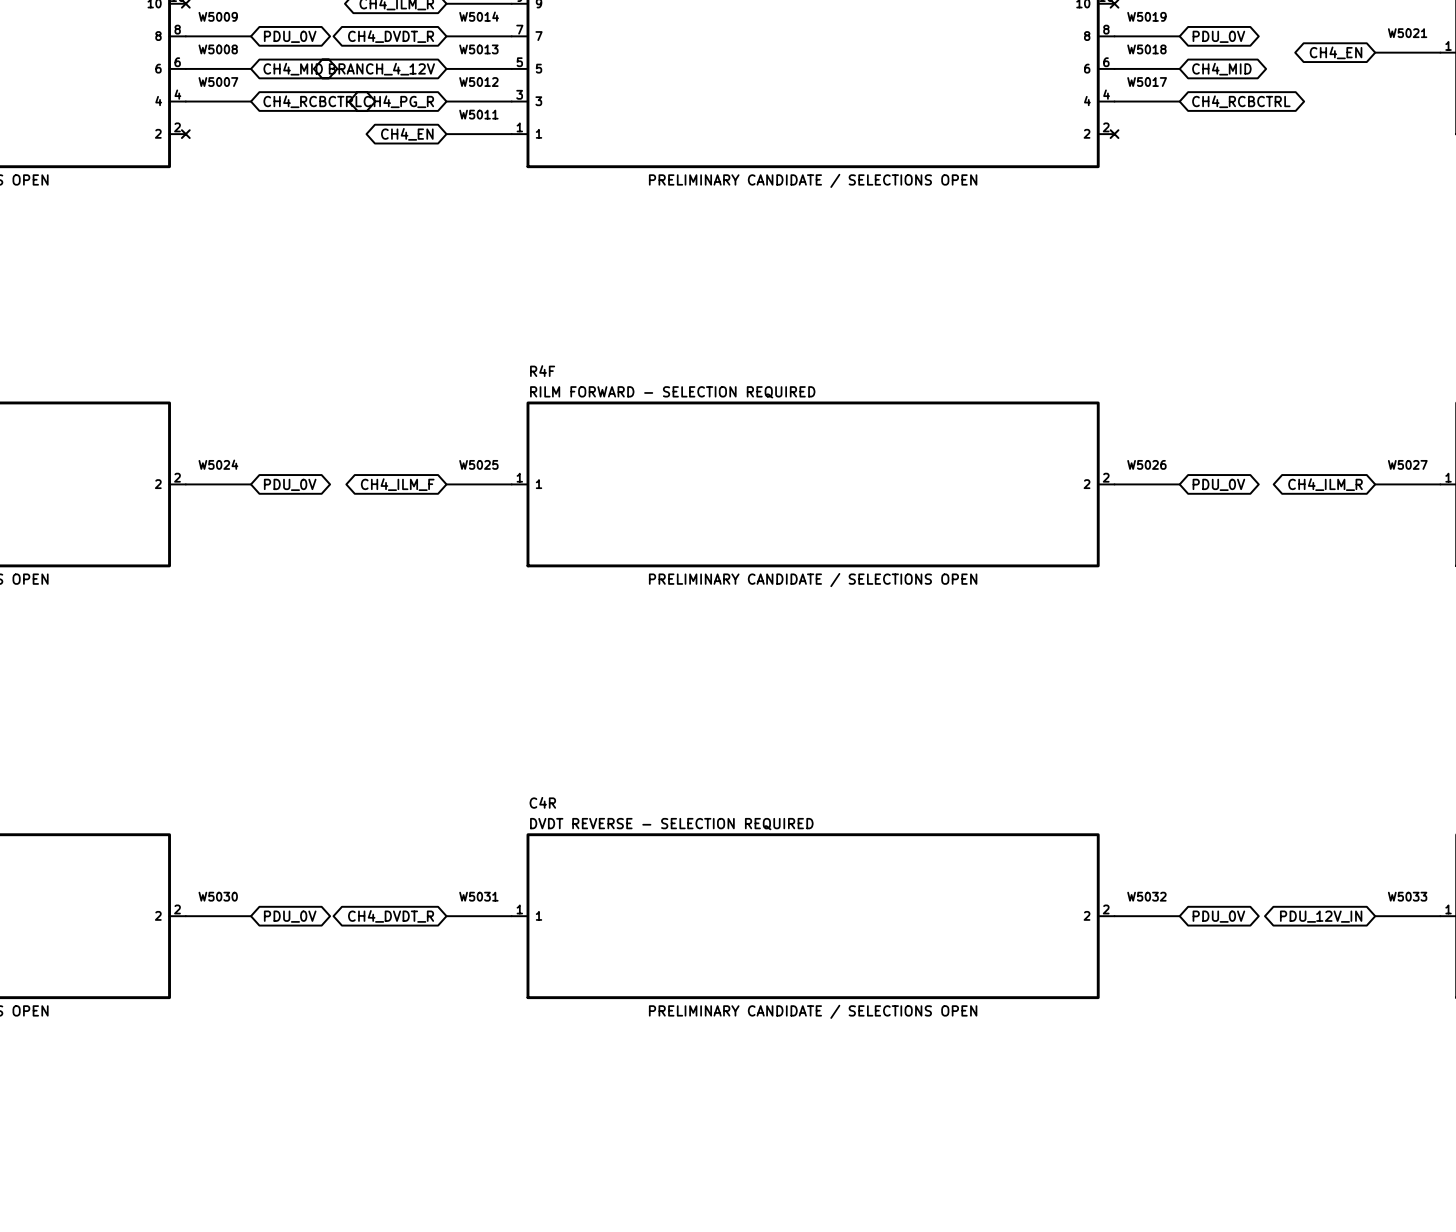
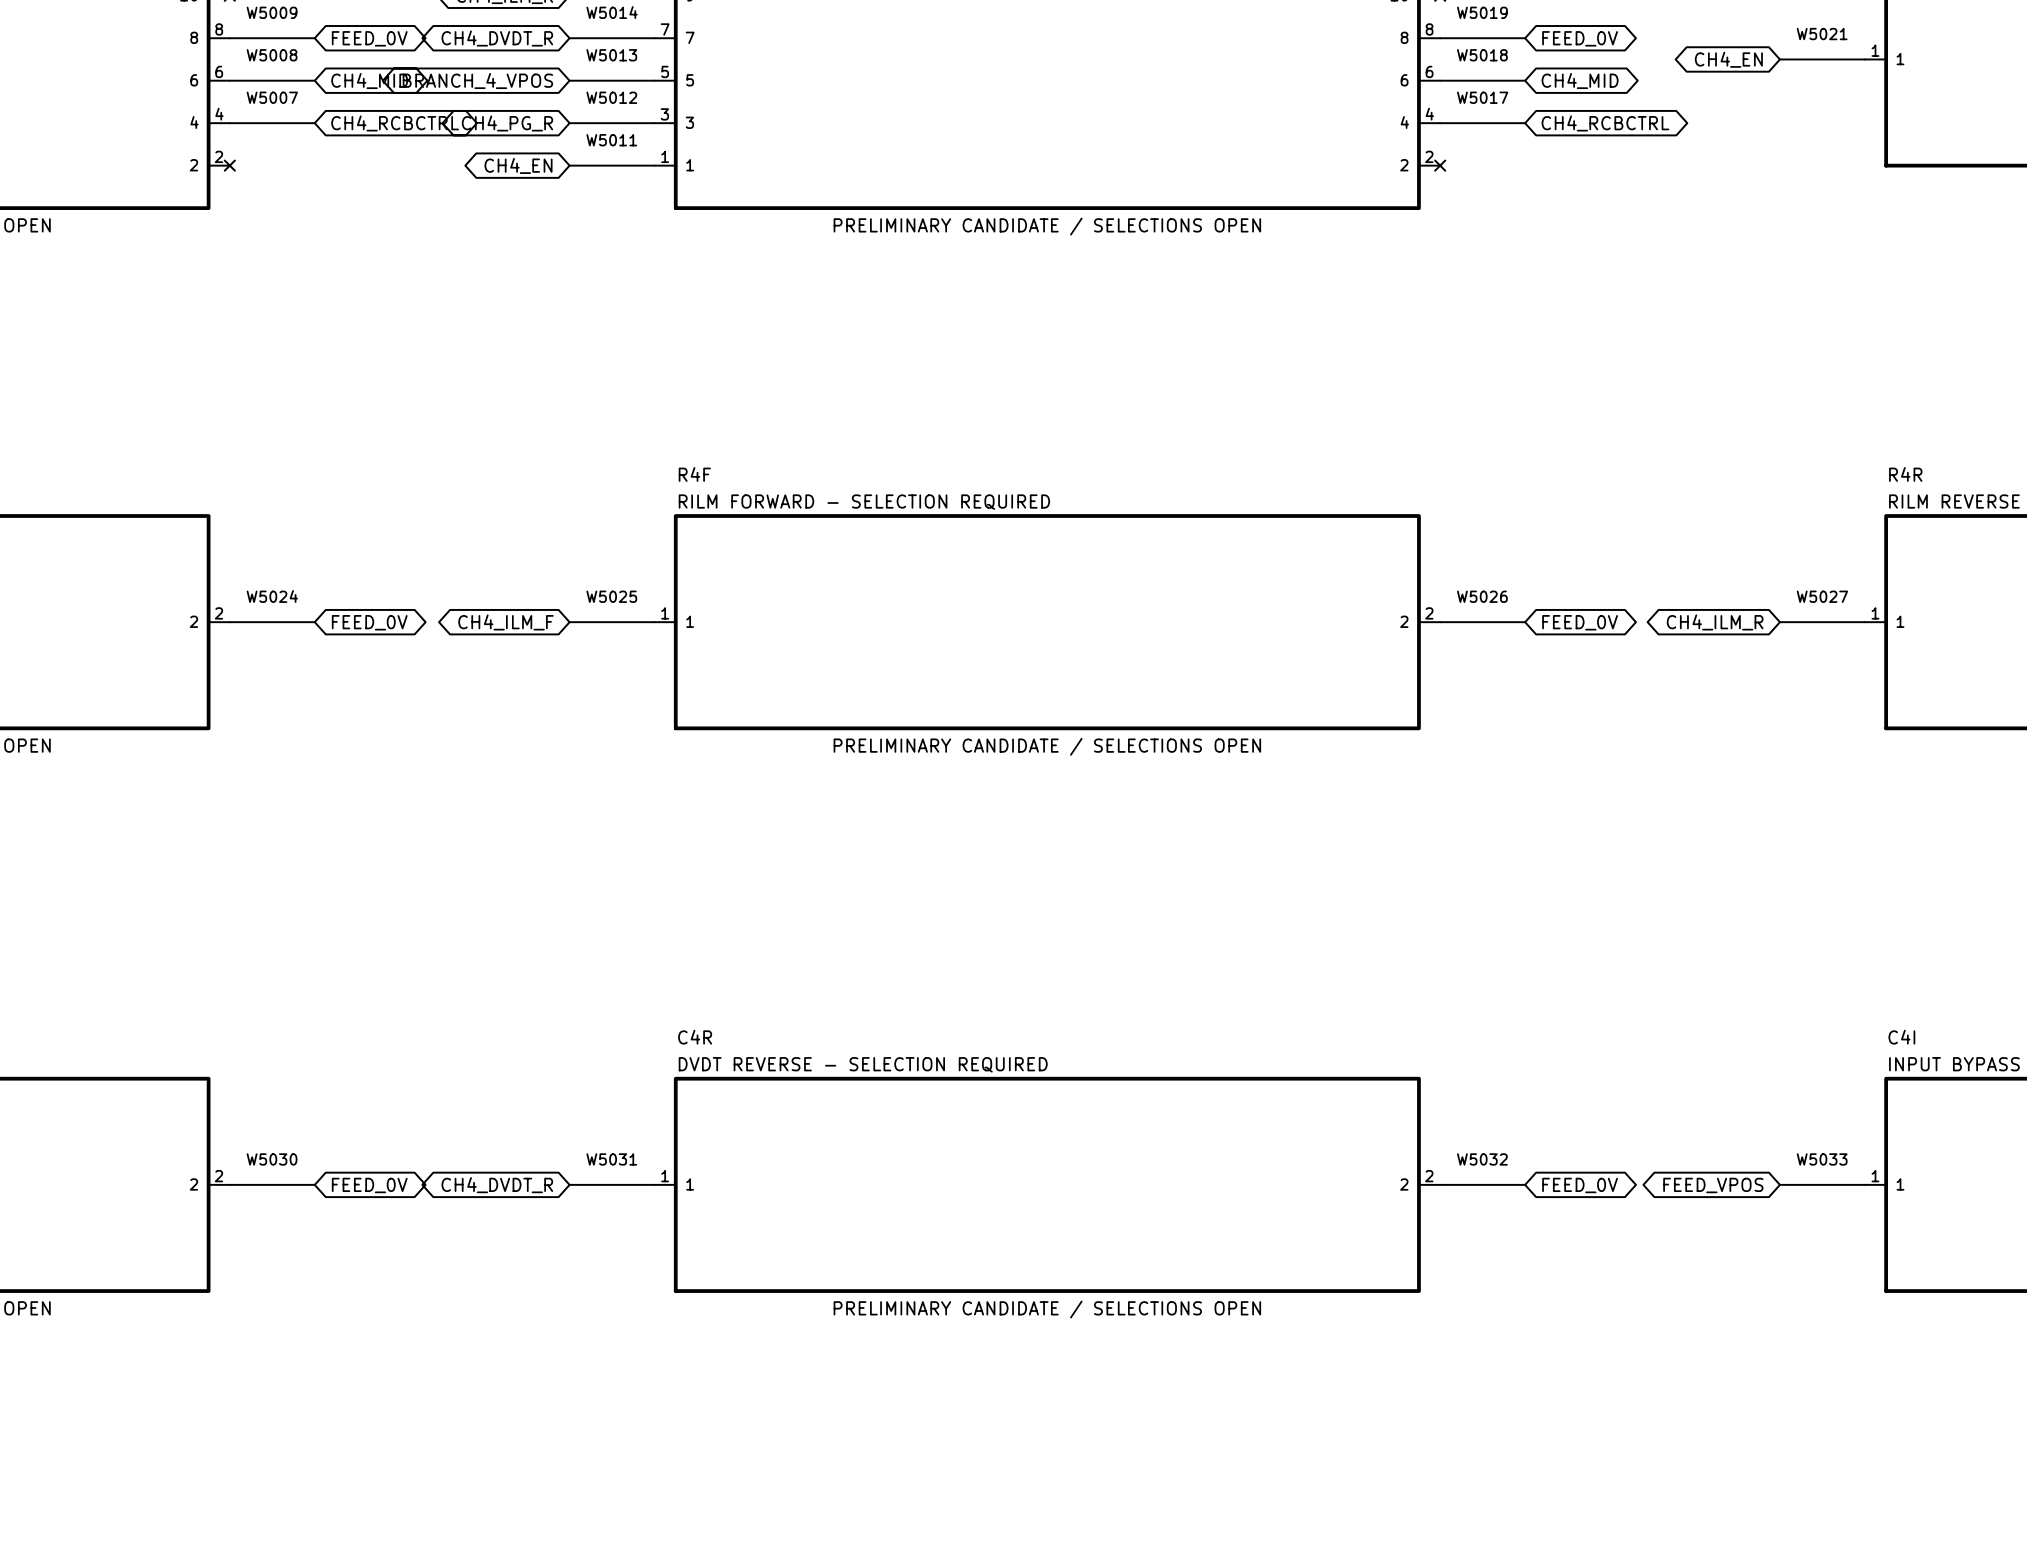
global label: PDU_0V (290, 36) -> FEED_0V (369, 38)
global label: PDU_0V (1218, 36) -> FEED_0V (1580, 38)
global label: BRANCH_4_12V (381, 69) -> BRANCH_4_VPOS (477, 81)
global label: PDU_0V (290, 484) -> FEED_0V (369, 622)
global label: PDU_0V (1218, 484) -> FEED_0V (1580, 622)
global label: PDU_0V (290, 916) -> FEED_0V (369, 1185)
global label: PDU_0V (1218, 916) -> FEED_0V (1580, 1185)
global label: PDU_12V_IN (1321, 916) -> FEED_VPOS (1713, 1185)

